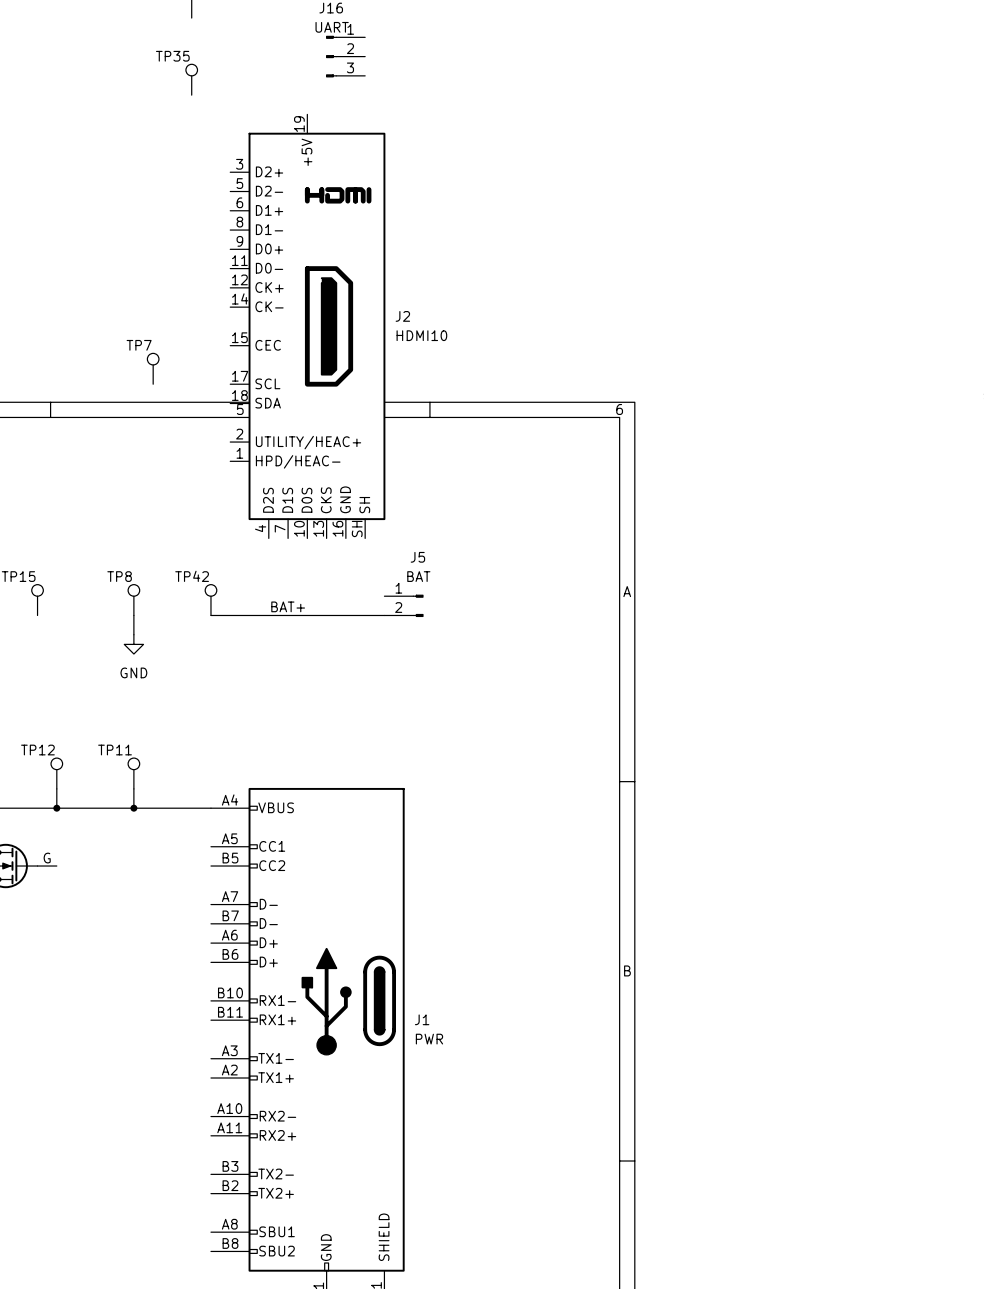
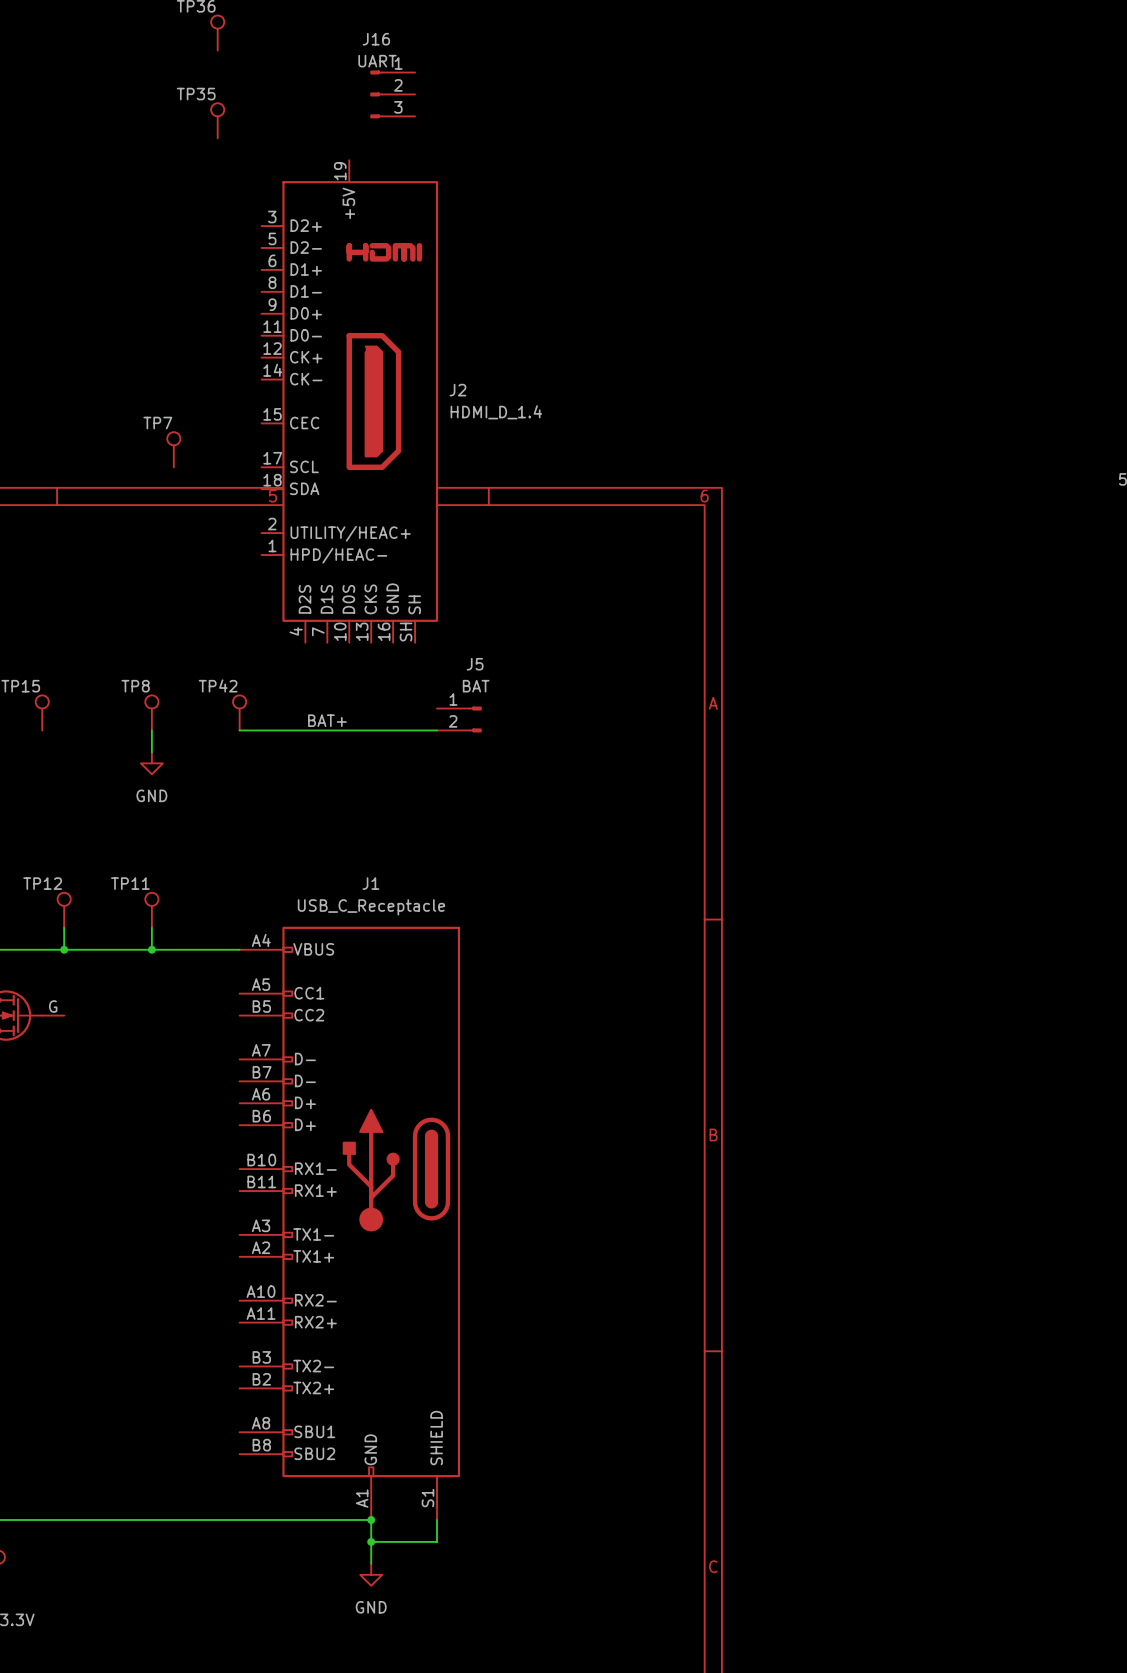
J2 value: HDMI10 (421, 335) -> HDMI_D_1.4 (496, 412)
J1 name position: J1 (422, 1019) -> J1 (370, 883)
J1 value: PWR (429, 1039) -> USB_C_Receptacle (371, 907)

